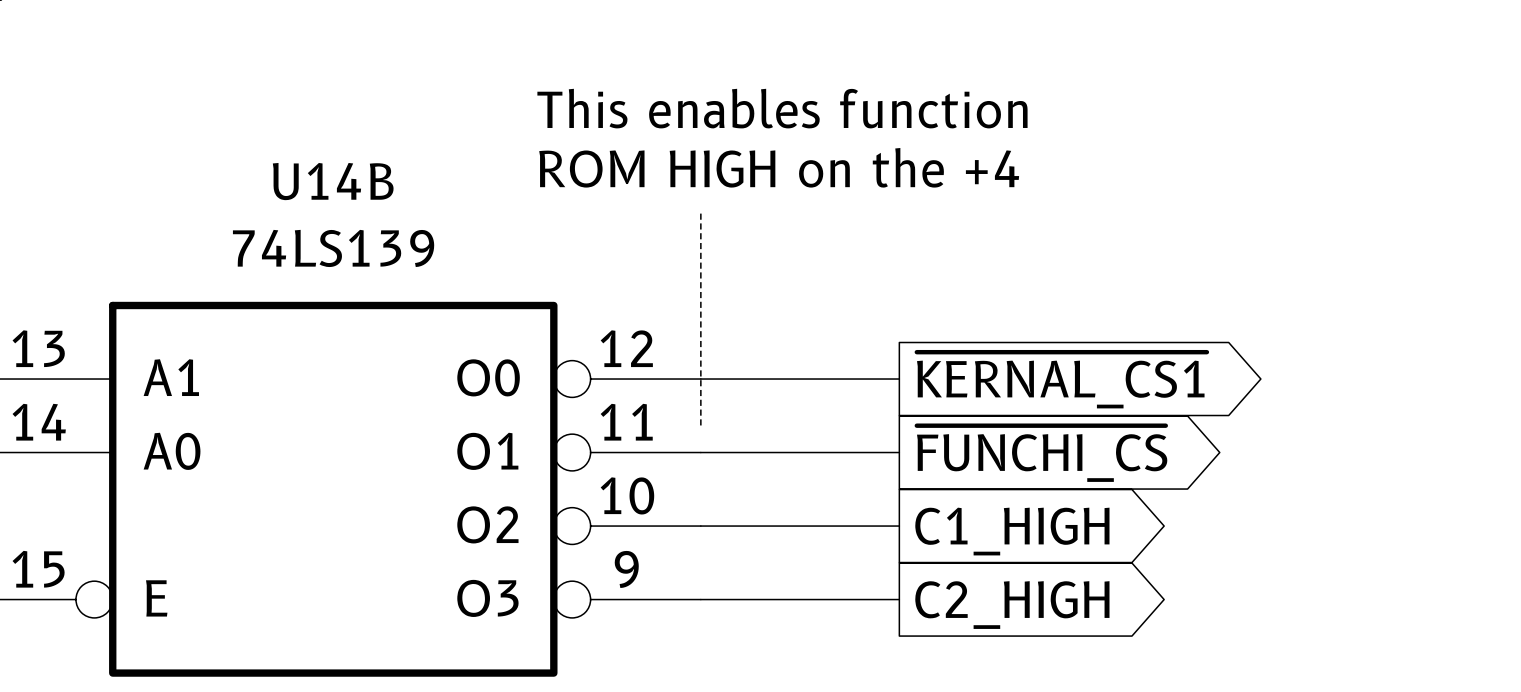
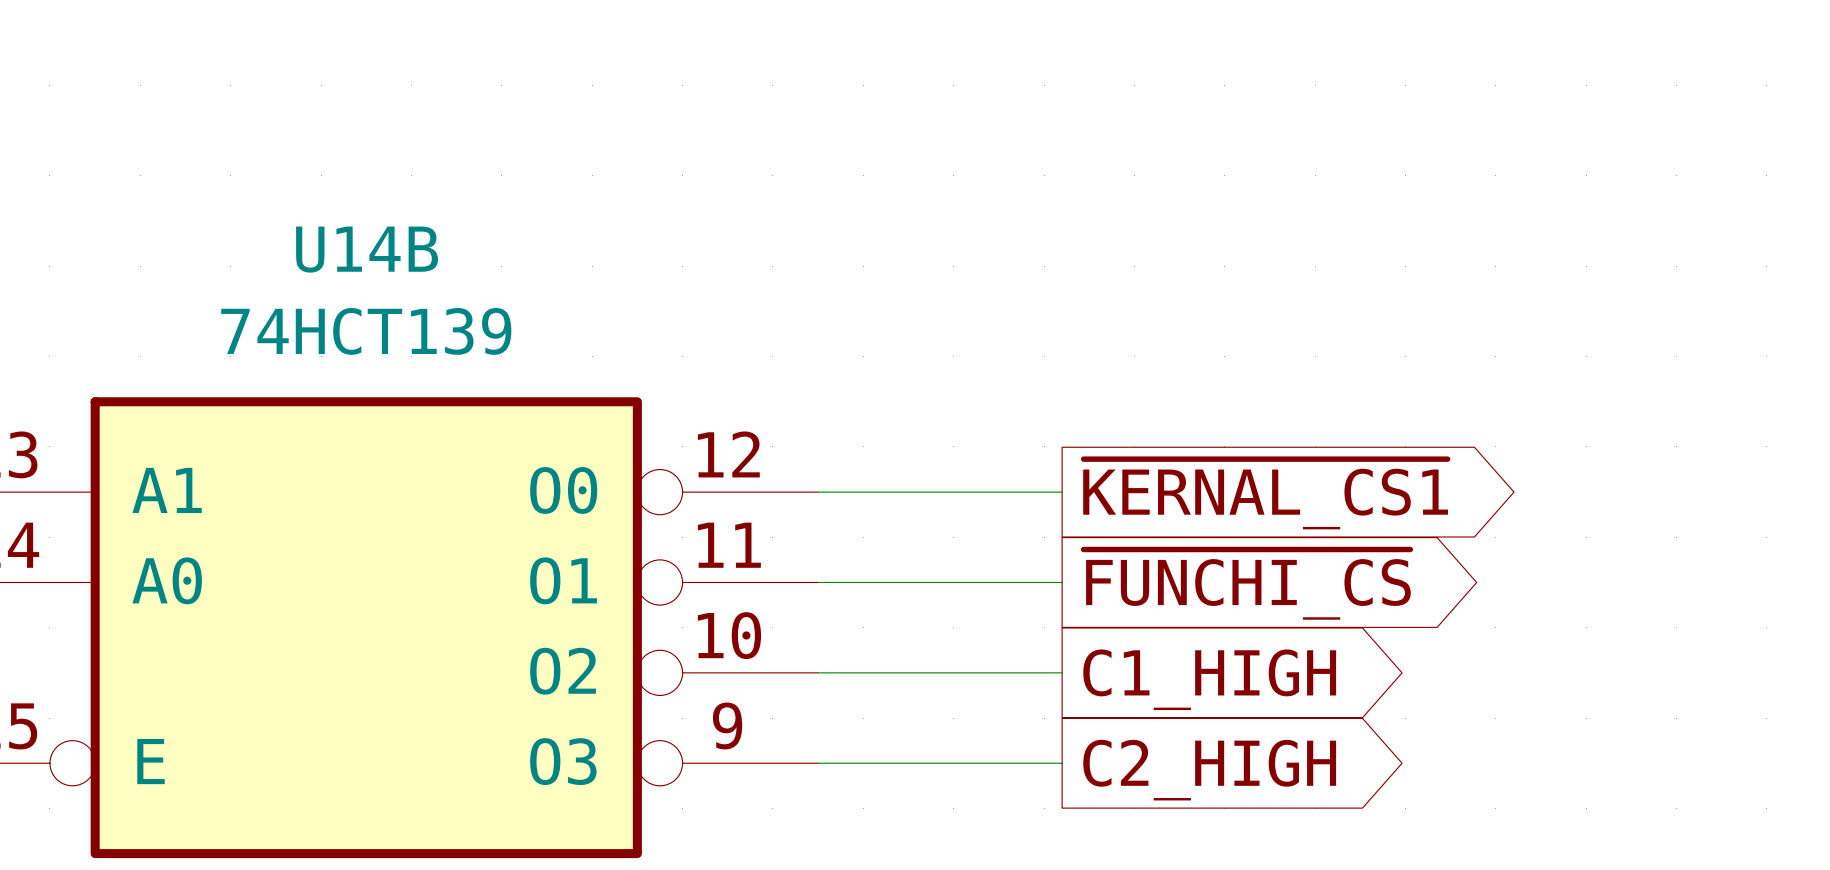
text: This enables function (782, 108) -> none
text: ROM HIGH on the +4 (779, 167) -> none
line: (700, 213) (700, 426) -> none
U14B value: 74LS139 (333, 248) -> 74HCT139 (366, 331)

